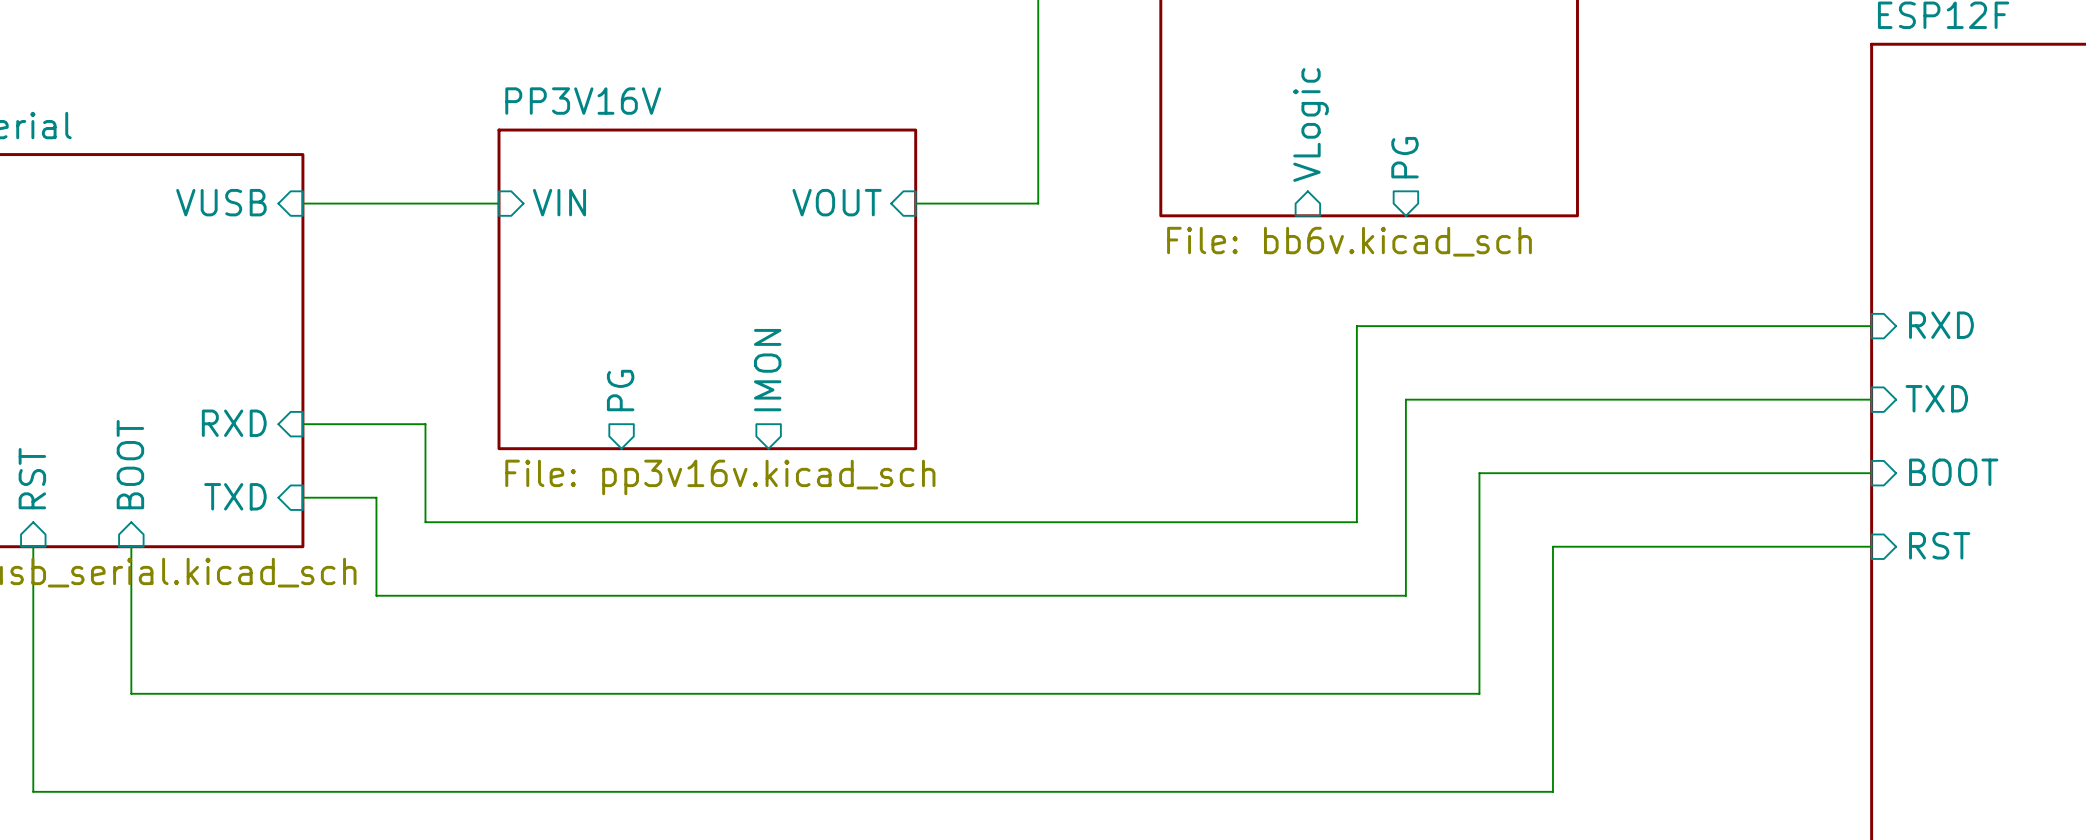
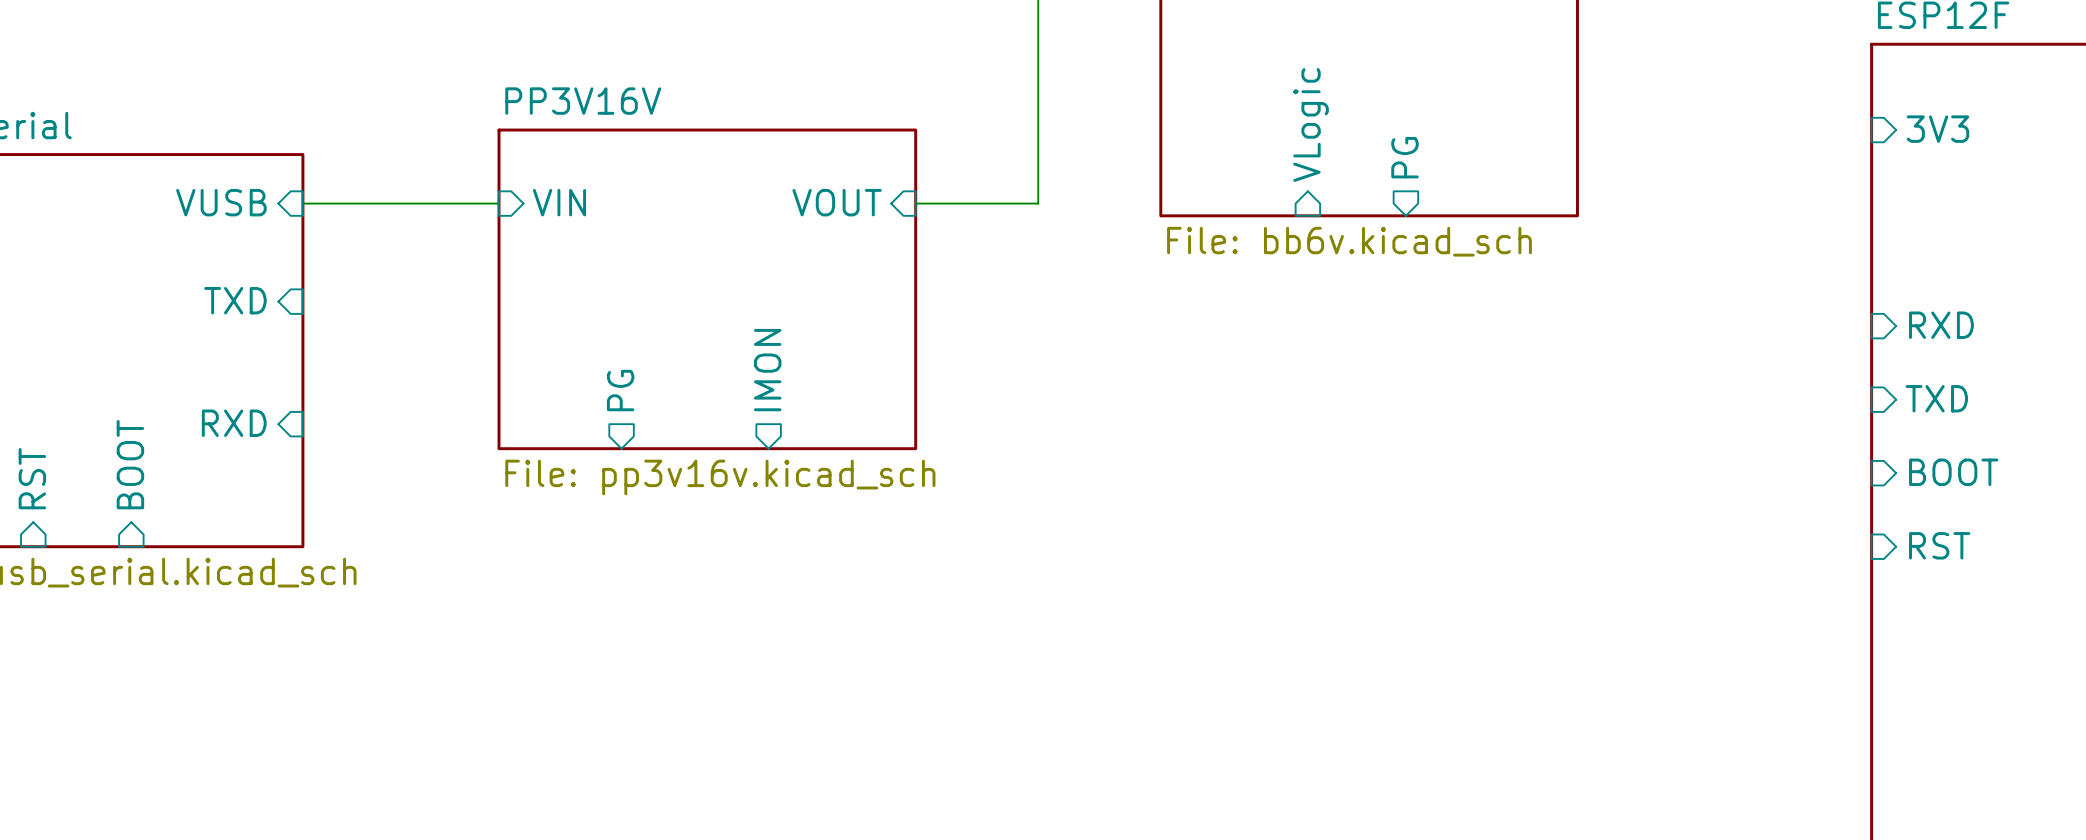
sheet pin: none -> 3V3 (1937, 129)
wire: (1871, 326) (1356, 326) (1356, 522) (425, 522) (425, 424) (302, 424) -> none
wire: (1871, 399) (1405, 399) (1405, 595) (376, 595) (376, 497) (302, 497) -> none
wire: (1871, 473) (1479, 473) (1479, 693) (131, 693) (131, 546) -> none
sheet pin position: TXD (235, 496) -> TXD (235, 300)
wire: (33, 546) (33, 791) (1552, 791) (1552, 546) (1871, 546) -> none

